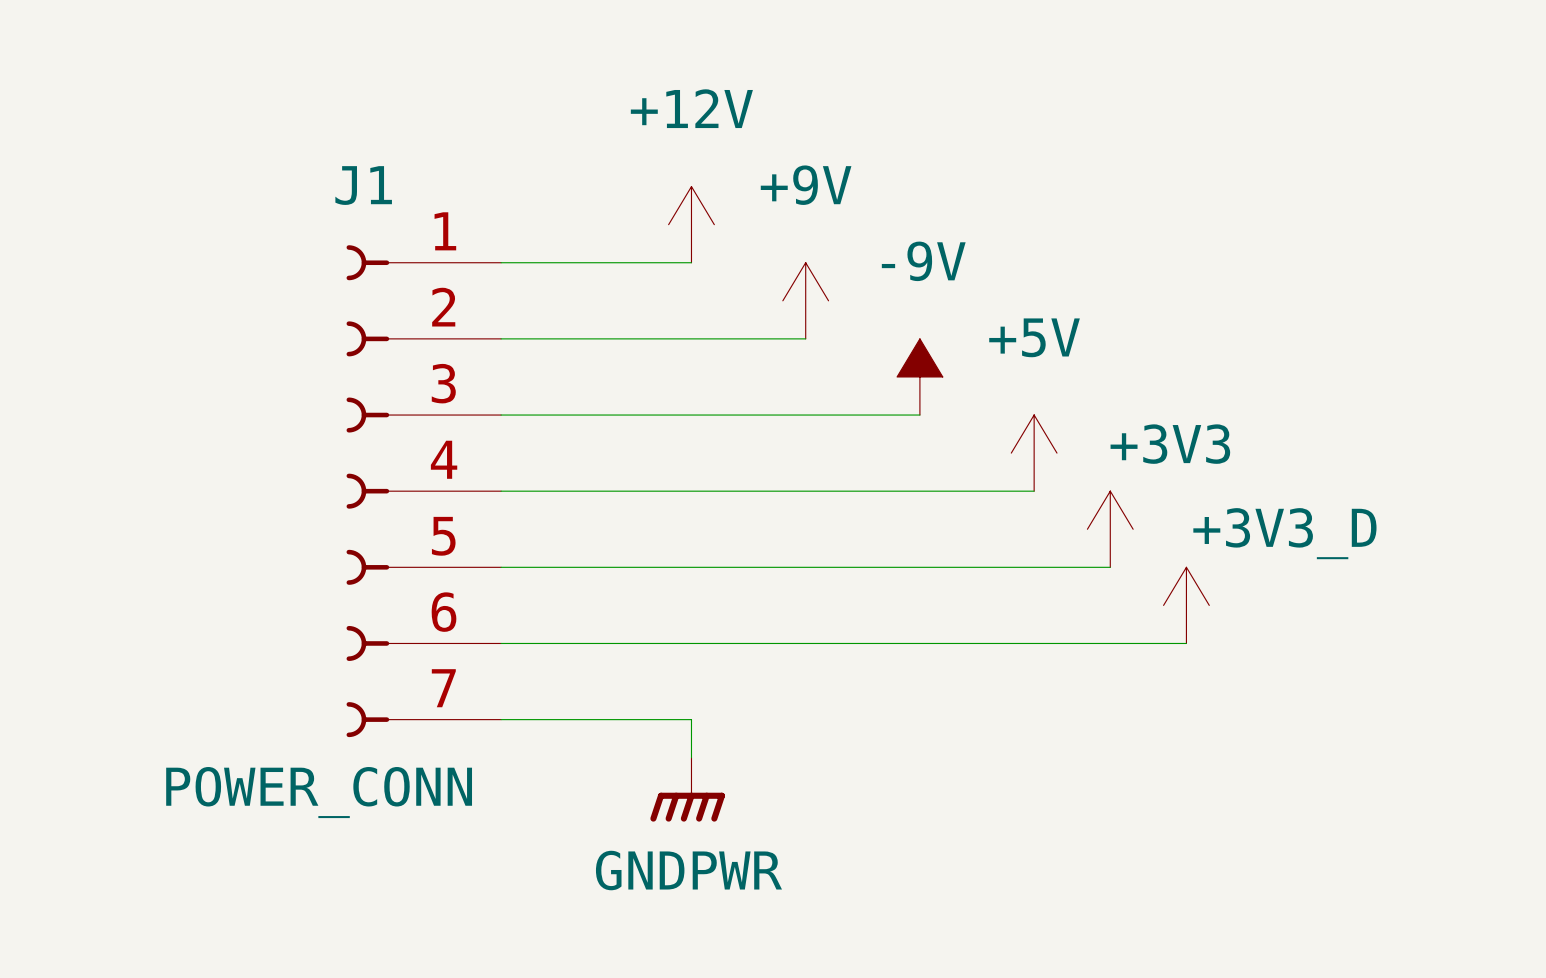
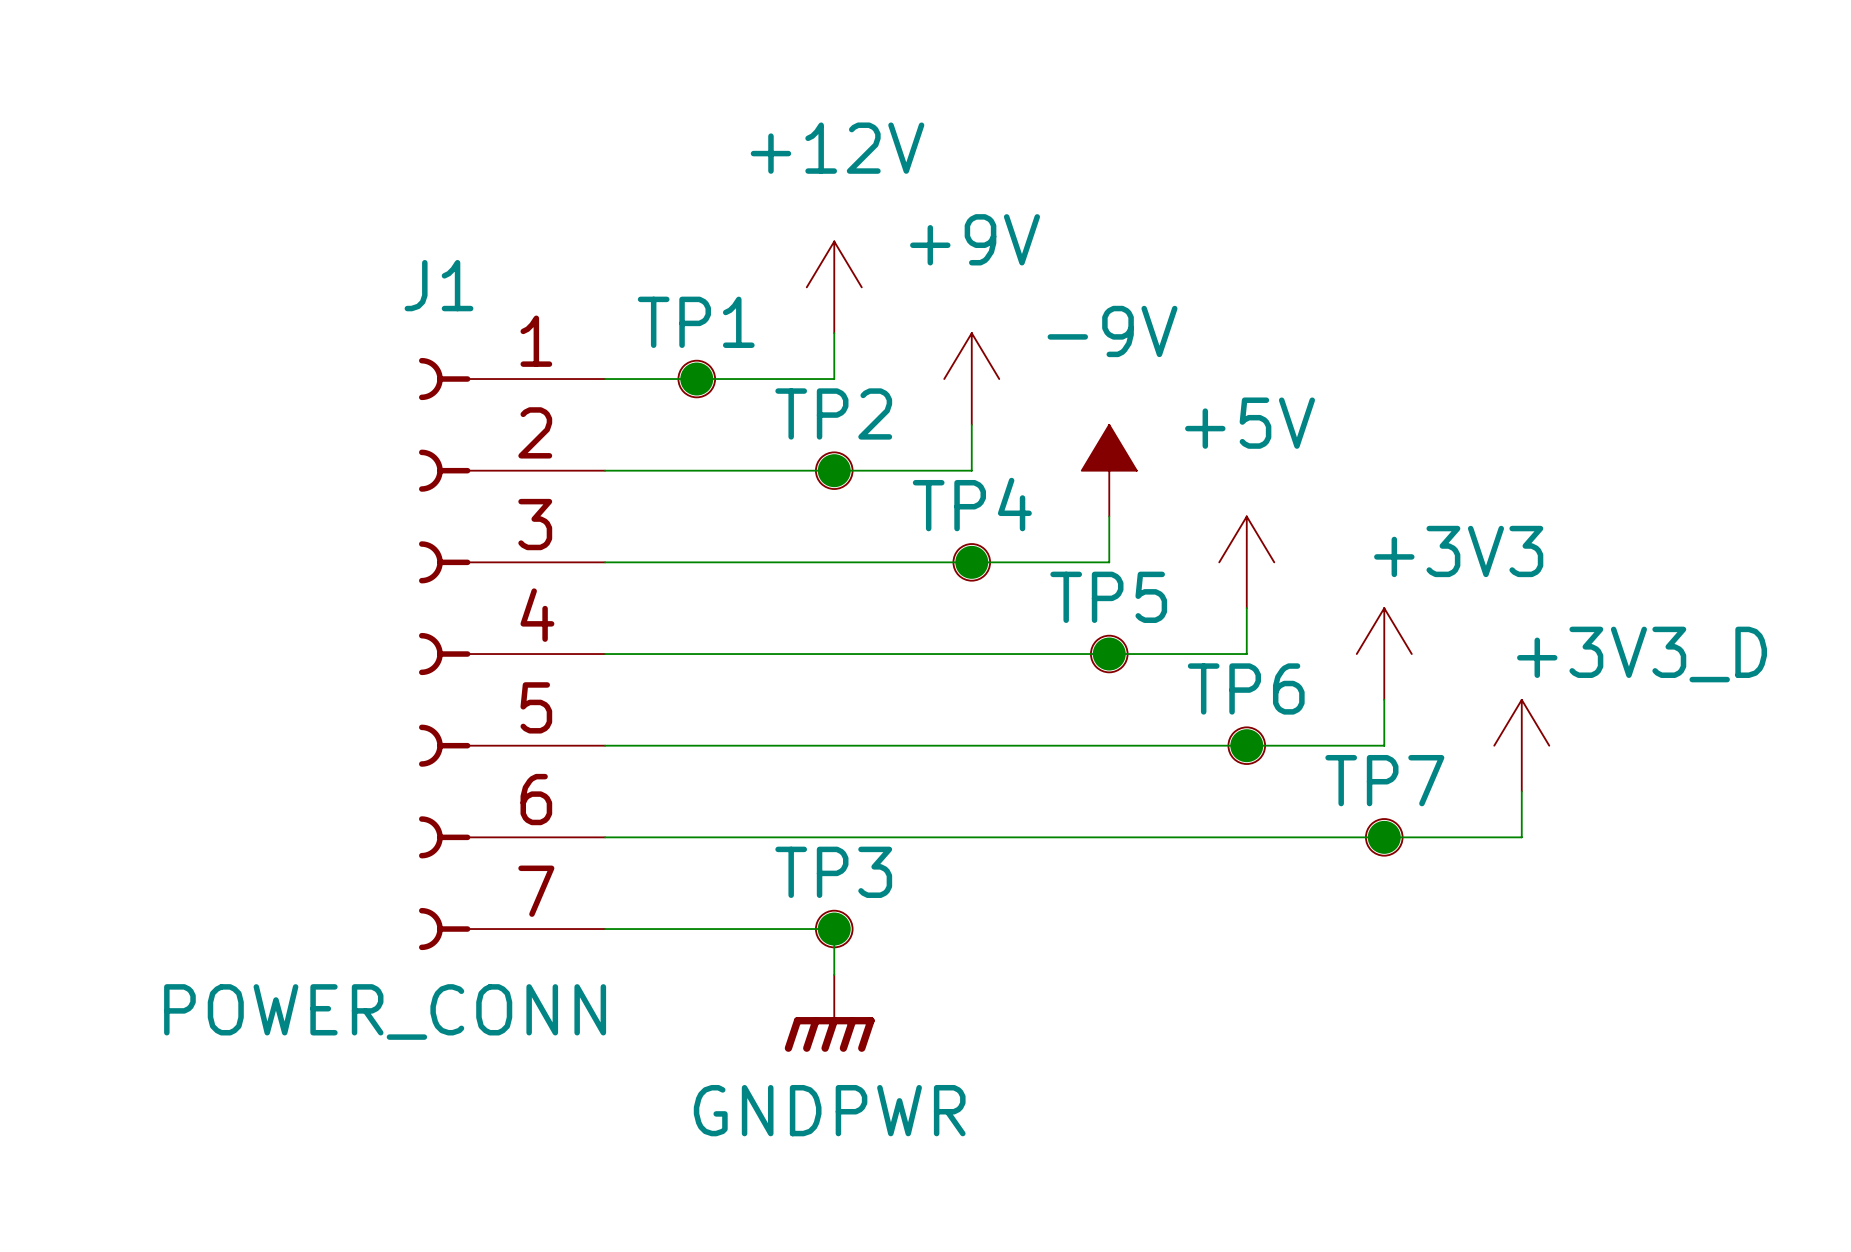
power symbol position: +12V (691, 224) -> +12V (834, 287)
junction: none -> (696, 379)
TP1: none -> (696, 379)
power symbol position: +9V (805, 300) -> +9V (971, 379)
junction: none -> (834, 470)
TP2: none -> (834, 470)
power symbol position: -9V (919, 376) -> -9V (1109, 470)
junction: none -> (971, 562)
TP4: none -> (971, 562)
power symbol position: +5V (1034, 453) -> +5V (1246, 562)
junction: none -> (1109, 654)
TP5: none -> (1109, 654)
power symbol position: +3V3 (1110, 529) -> +3V3 (1384, 654)
wire: none -> (1384, 699) (1384, 745) (1338, 745)
junction: none -> (1246, 745)
TP6: none -> (1246, 745)
power symbol position: +3V3_D (1186, 605) -> +3V3_D (1521, 745)
wire: none -> (1521, 791) (1521, 837) (1430, 837)
junction: none -> (1384, 837)
TP7: none -> (1384, 837)
junction: none -> (834, 929)
TP3: none -> (834, 929)

